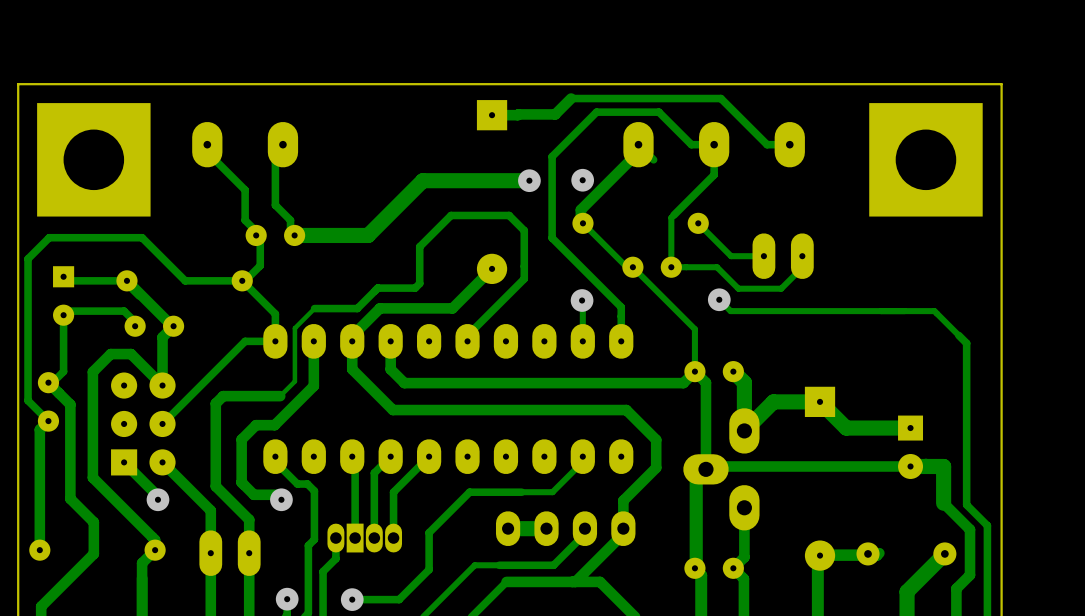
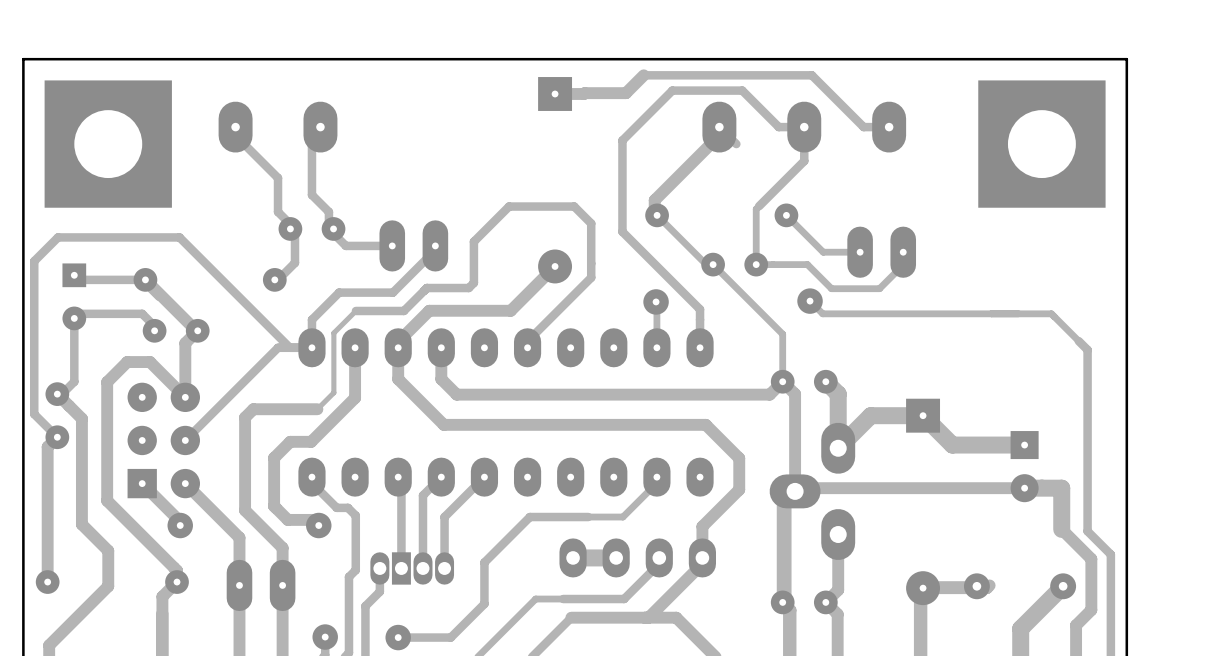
track: (529, 180) (422, 180) (368, 235) (294, 235) -> none
via: (529, 180) -> none
via: (582, 180) -> none
track: none -> (328, 228) (345, 245) (392, 245)
part: none -> (413, 245)
track: none -> (430, 245) (435, 245) (435, 250) (392, 292) (339, 292) (311, 319)
track: (275, 316) (275, 313) (242, 280) (185, 280) (142, 237) (49, 237) (28, 258) (28, 400) -> (289, 347) (179, 237) (58, 237) (34, 261) (34, 414)

